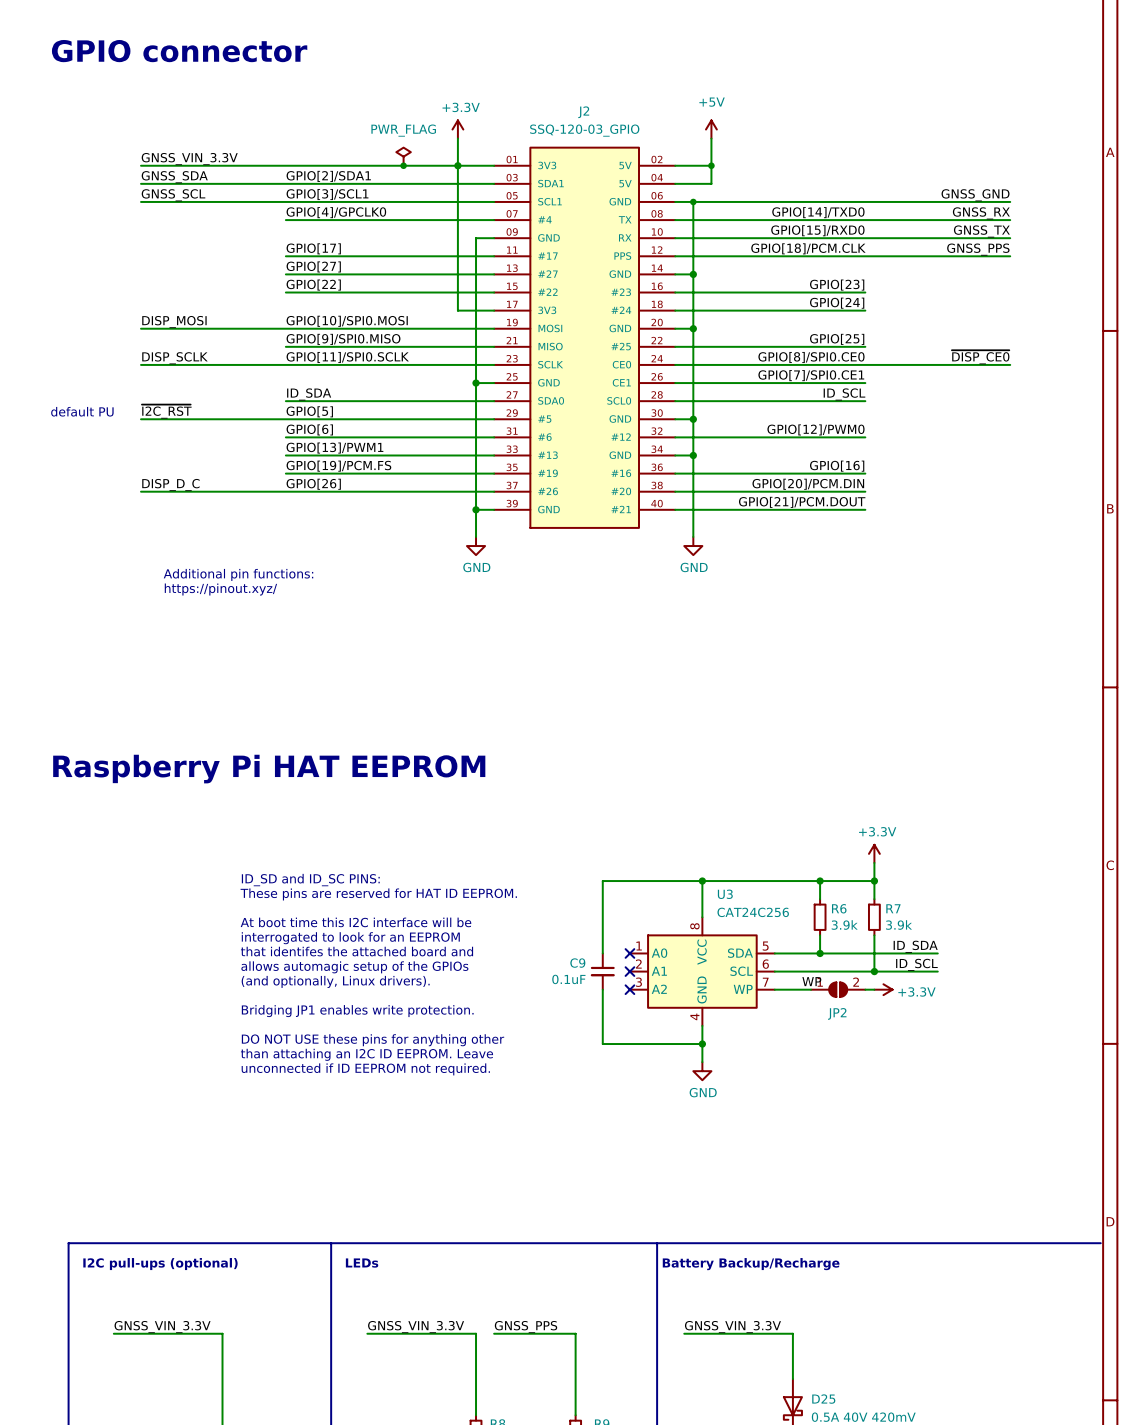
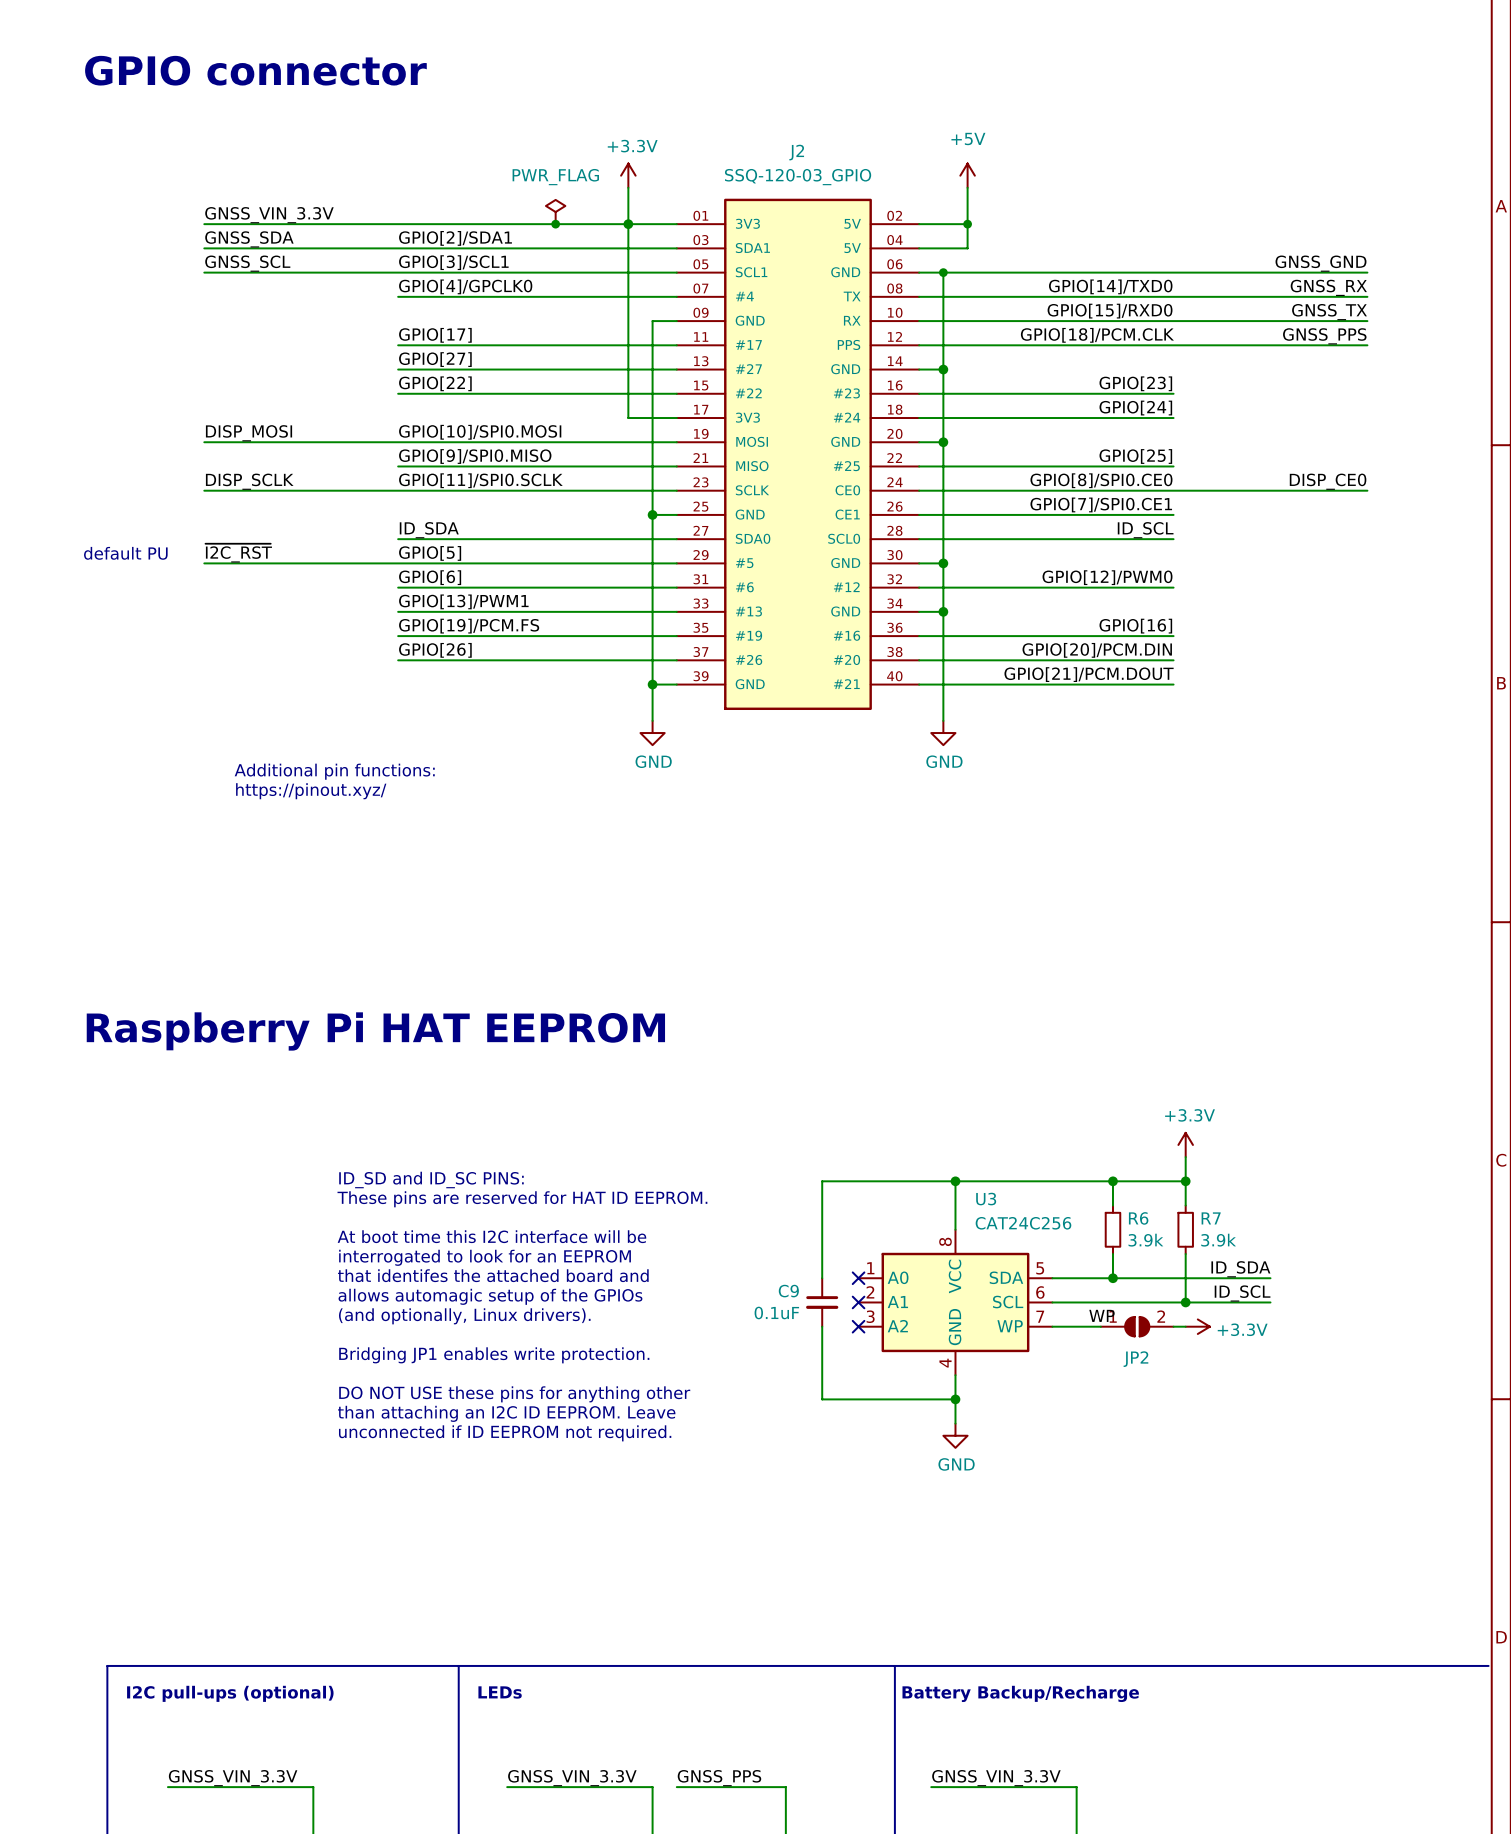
label: ~{DISP_CE0} (980, 357) -> DISP_CE0 (1328, 481)
label: DISP_D_C (170, 485) -> none
wire: (141, 491) (285, 491) -> none

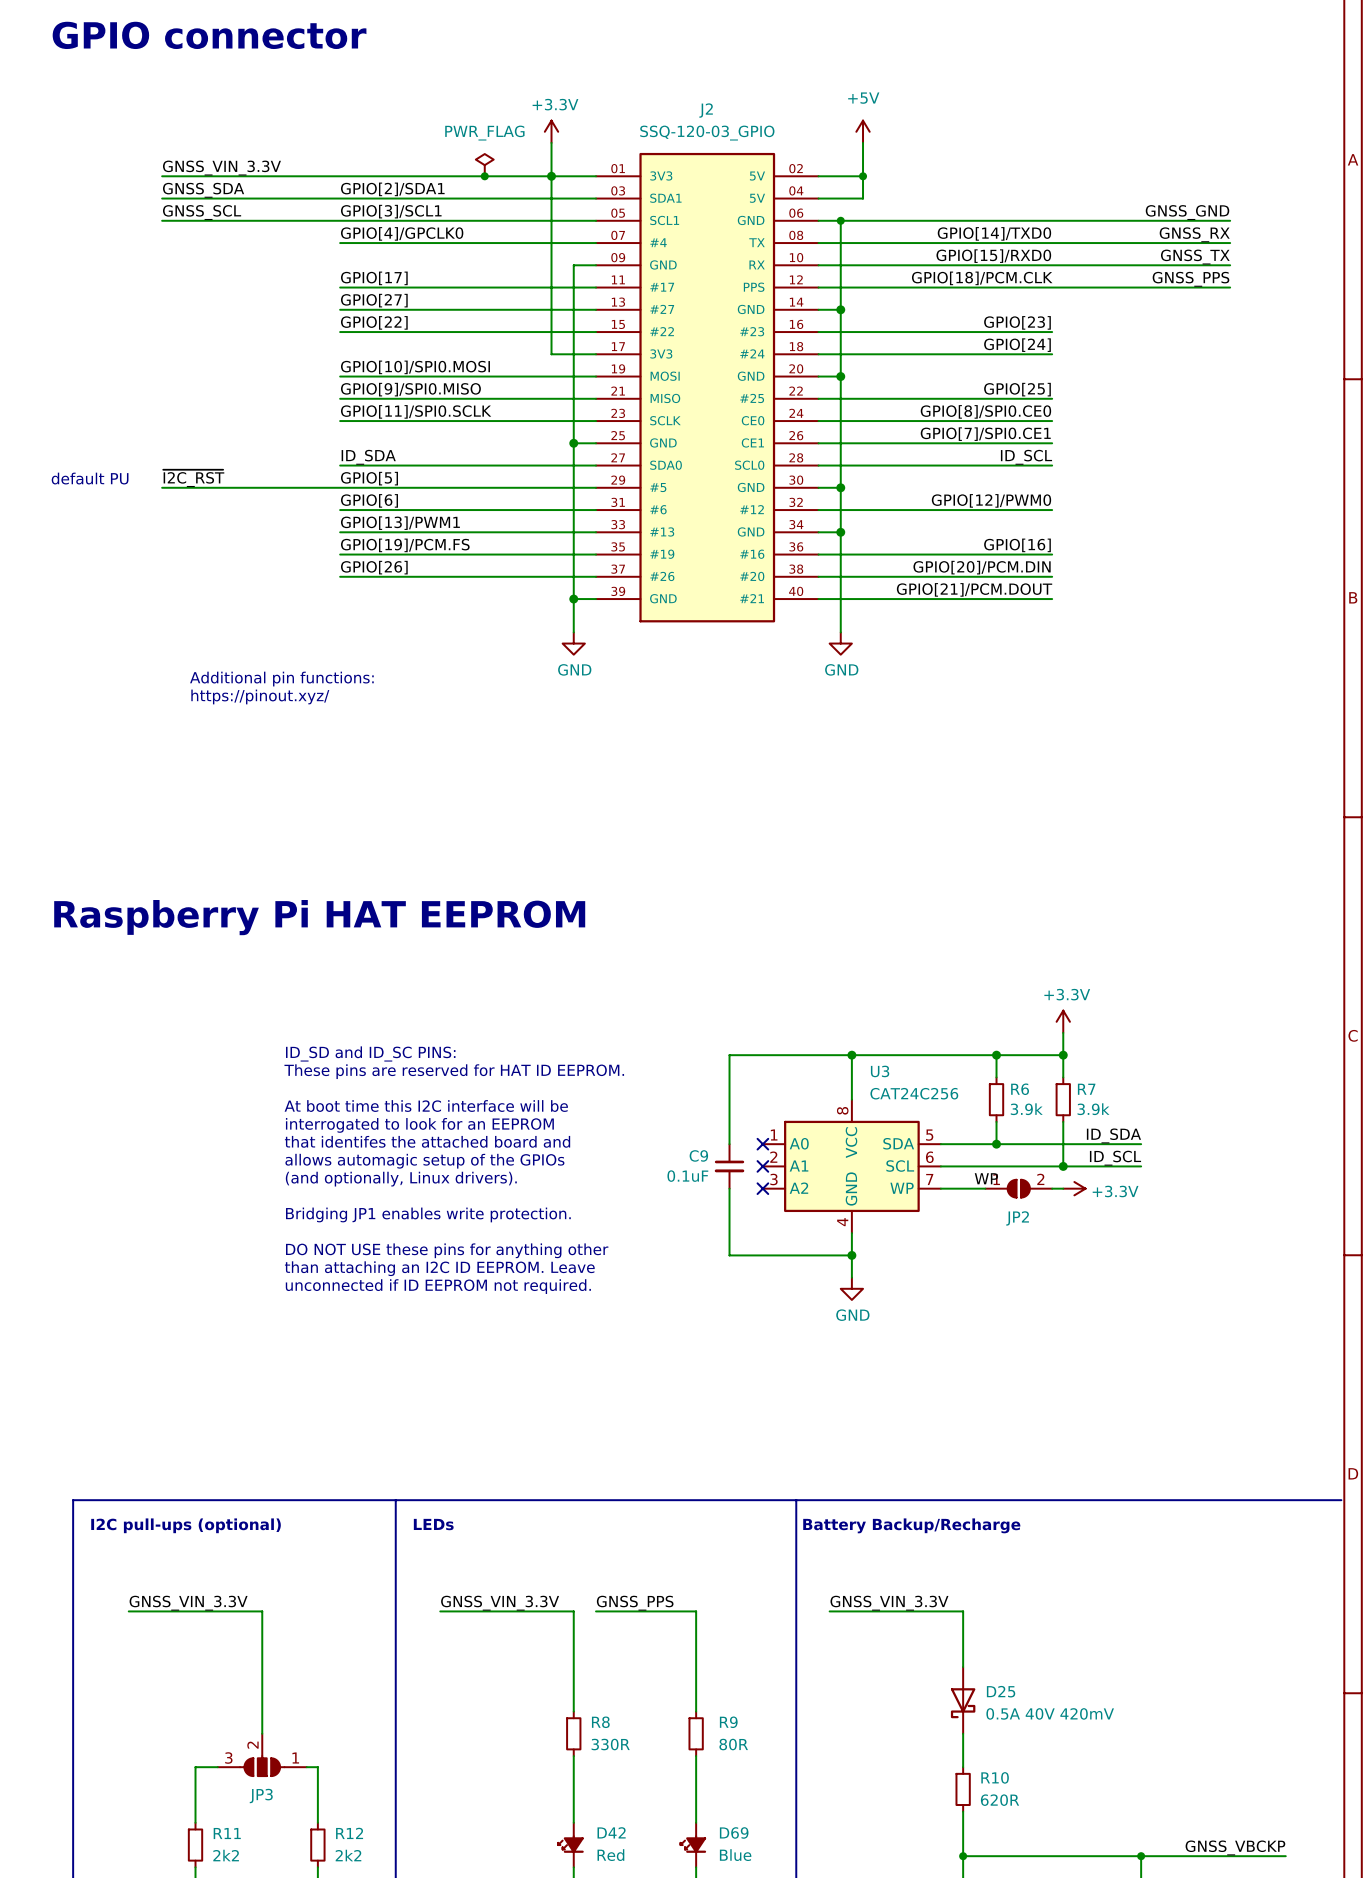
label: DISP_MOSI (249, 433) -> none
wire: (204, 442) (398, 442) -> none
label: DISP_SCLK (249, 481) -> none
label: DISP_CE0 (1328, 481) -> none
wire: (204, 490) (398, 490) -> none
wire: (1173, 490) (1367, 490) -> none

